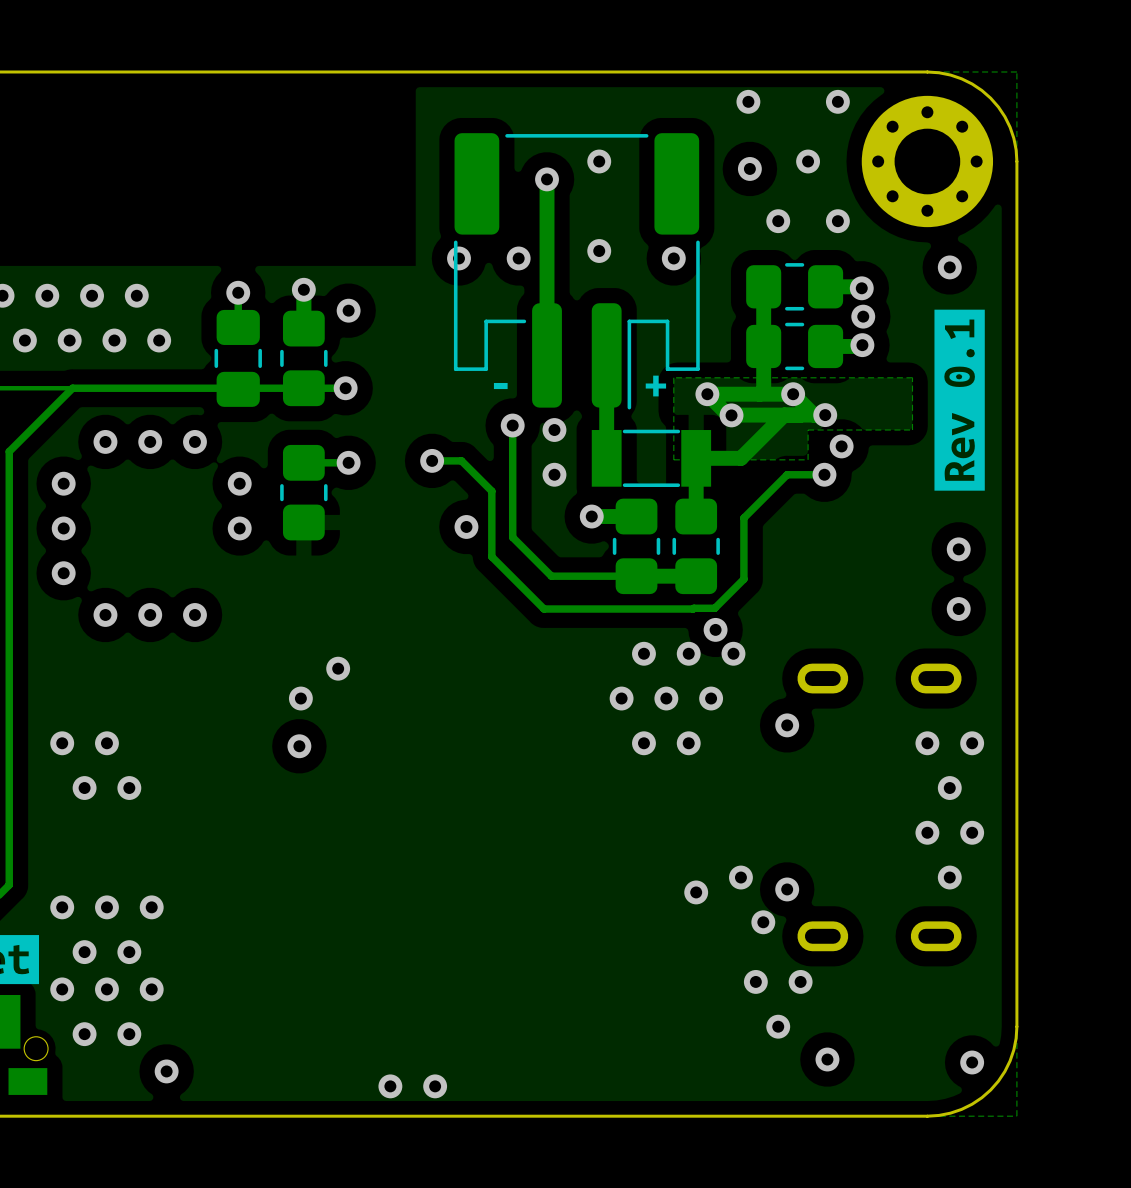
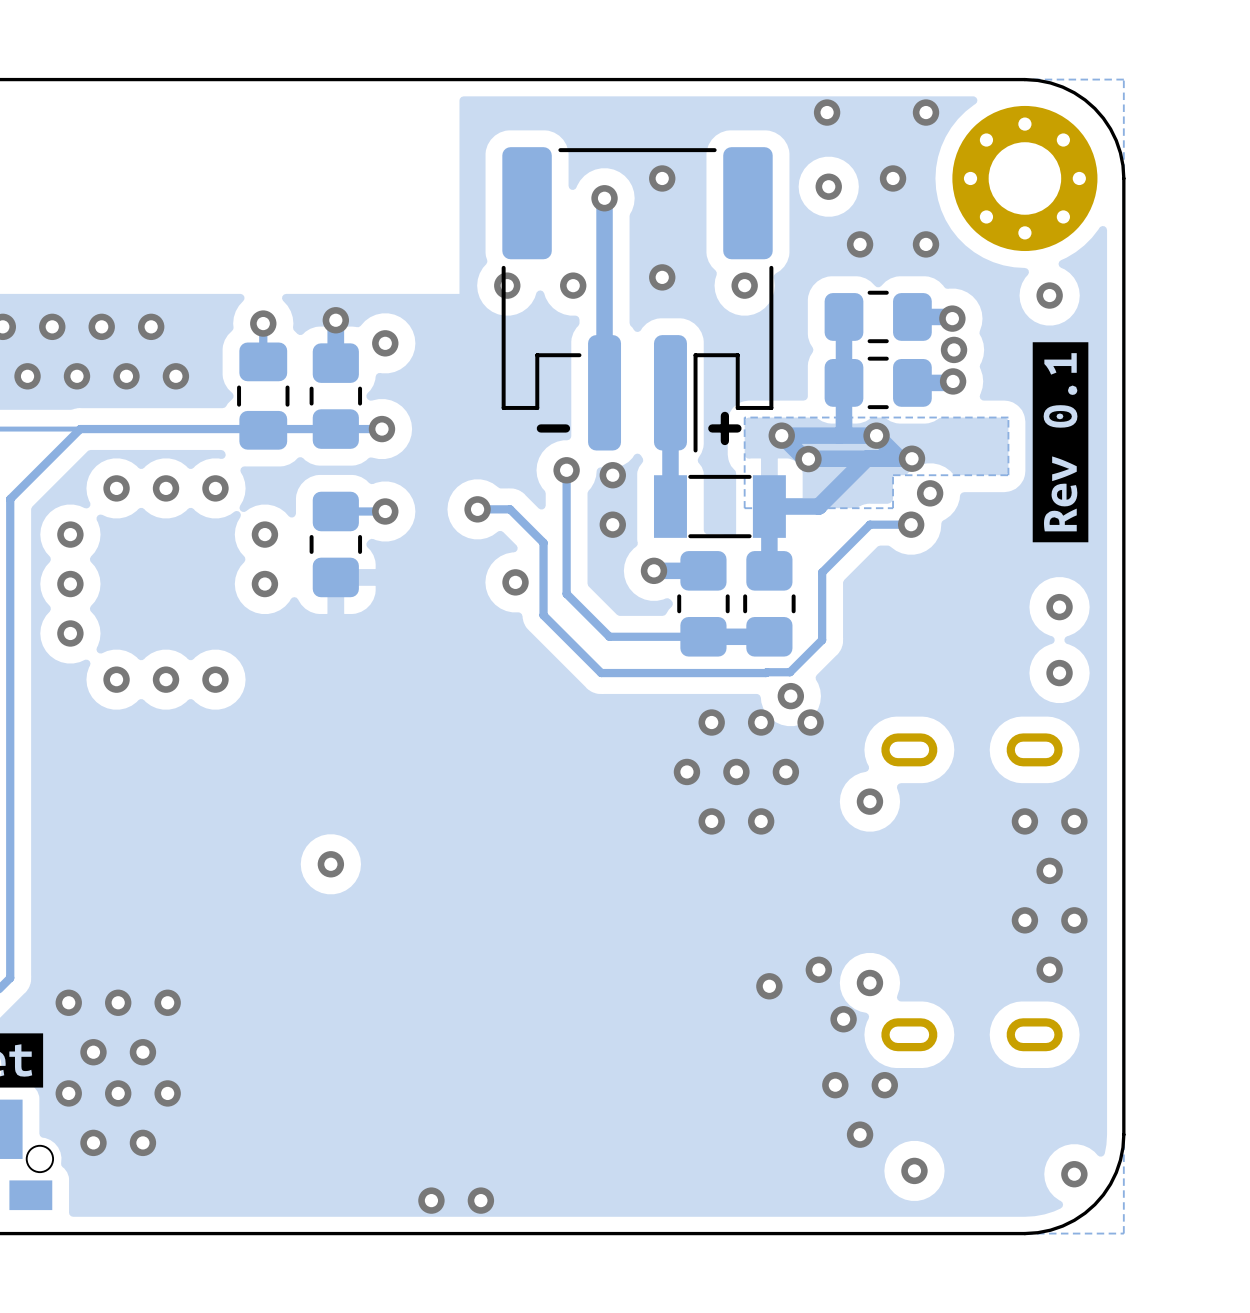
via: (338, 668) -> none
via: (300, 698) -> none
via: (62, 743) -> none
via: (106, 743) -> none
via position: (299, 746) -> (330, 864)
via: (84, 788) -> none
via: (129, 788) -> none
via: (166, 1071) -> none

